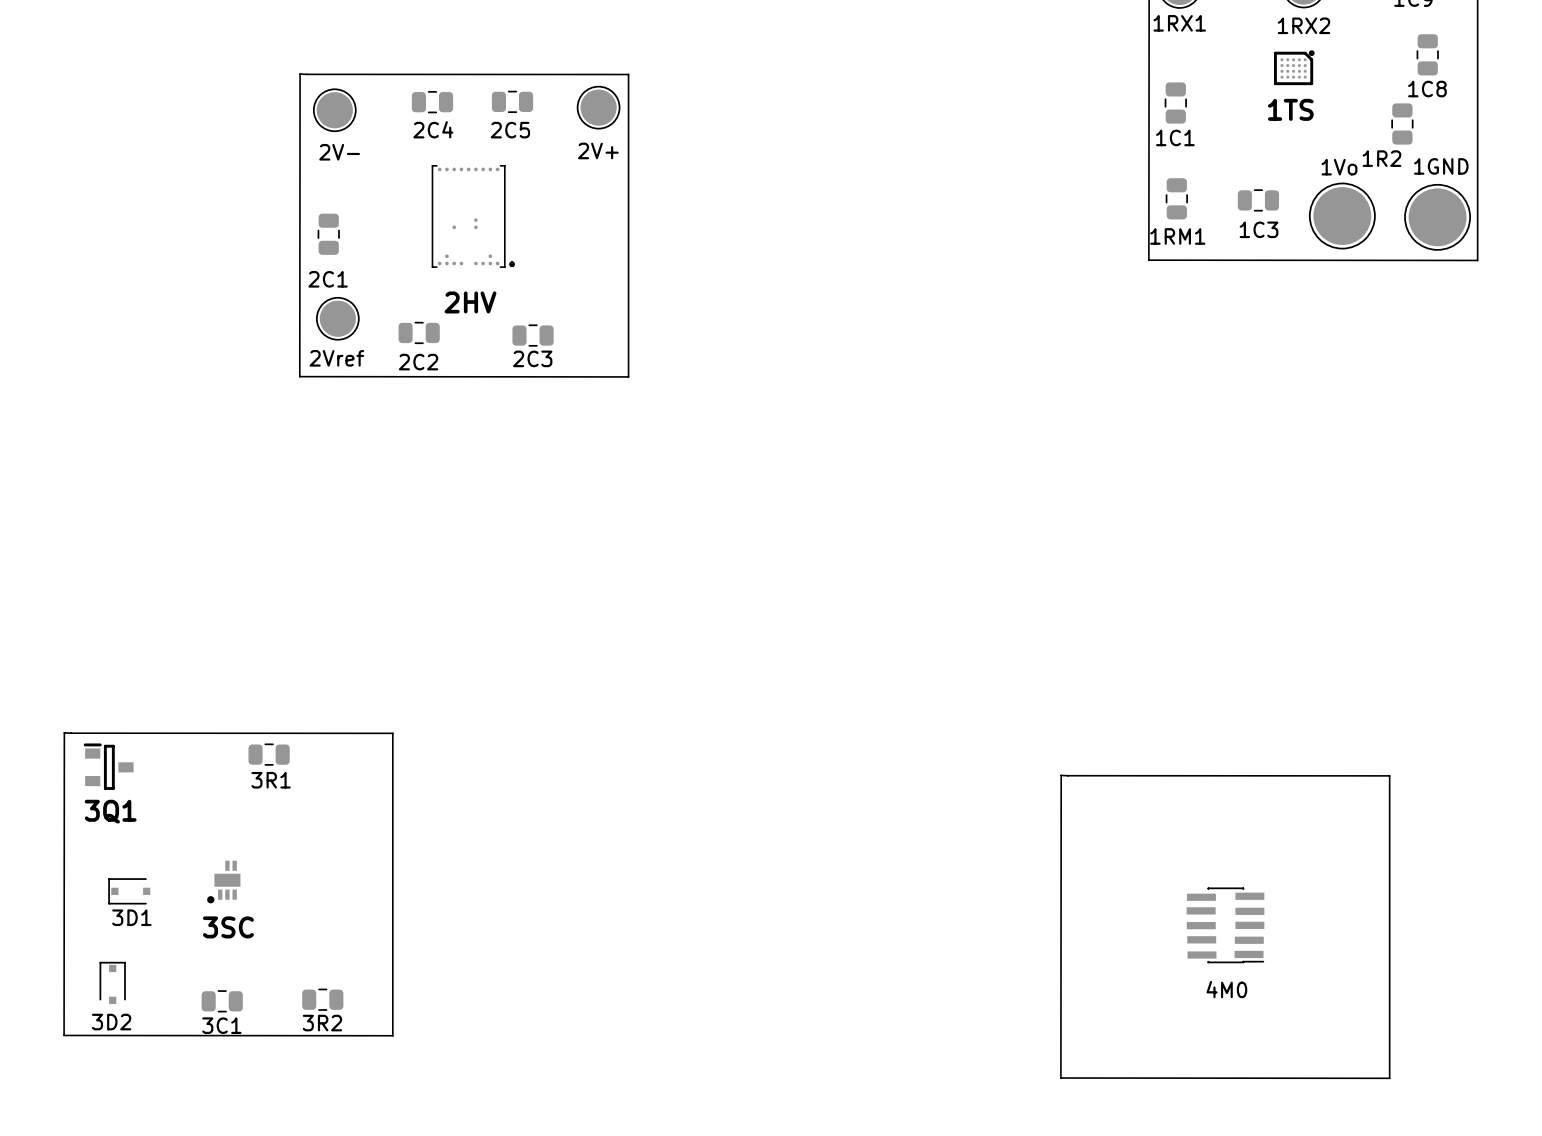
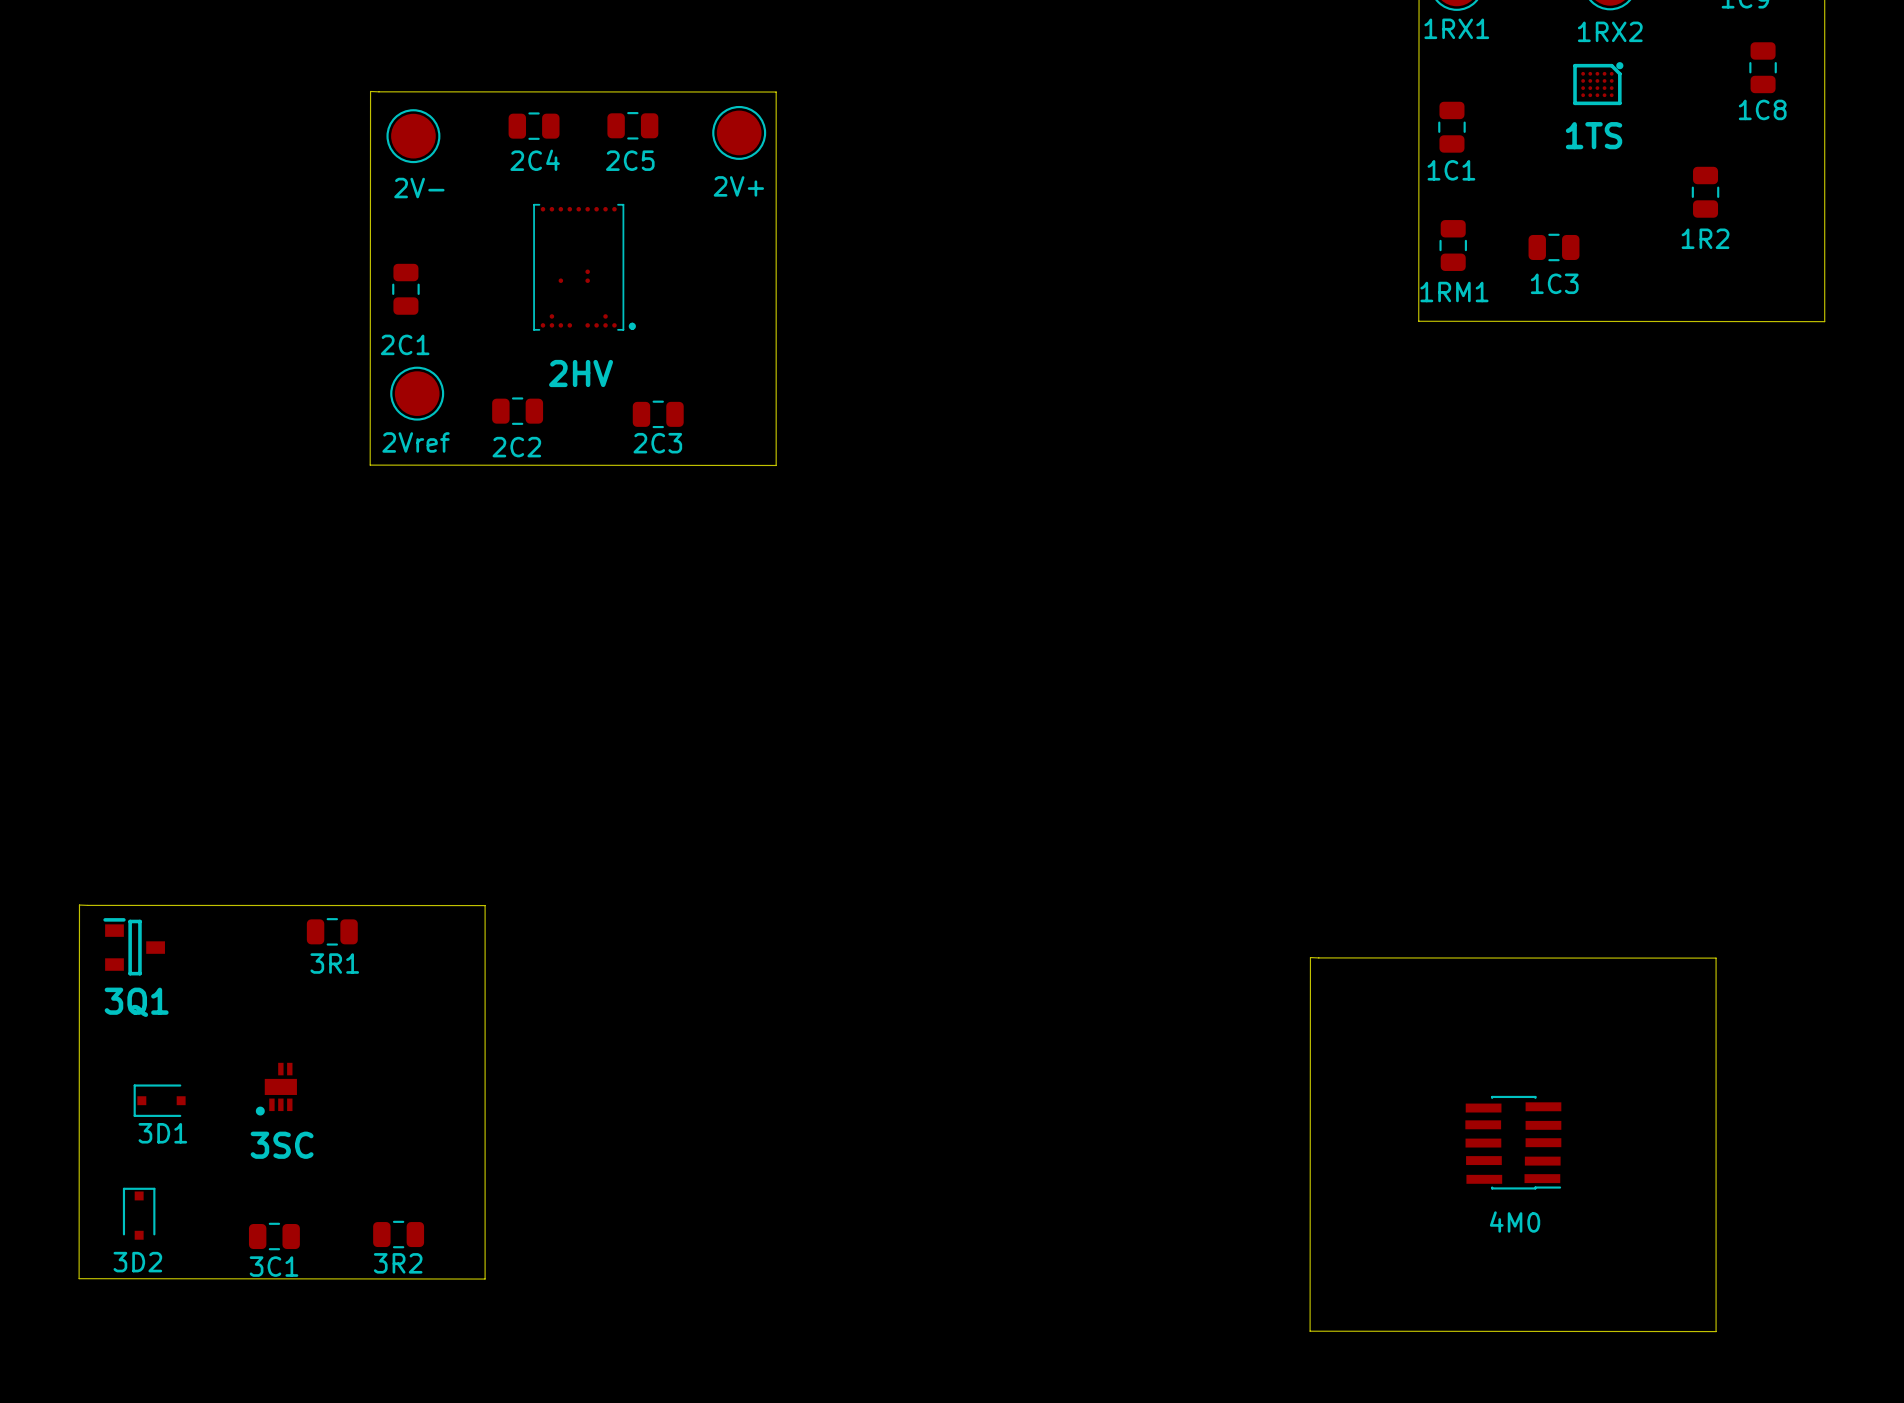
1R2 position: (1402, 124) -> (1705, 192)
1R2 name position: 1R2 (1382, 158) -> 1R2 (1705, 238)
1Vo: (1342, 216) -> none
1GND: (1437, 217) -> none

